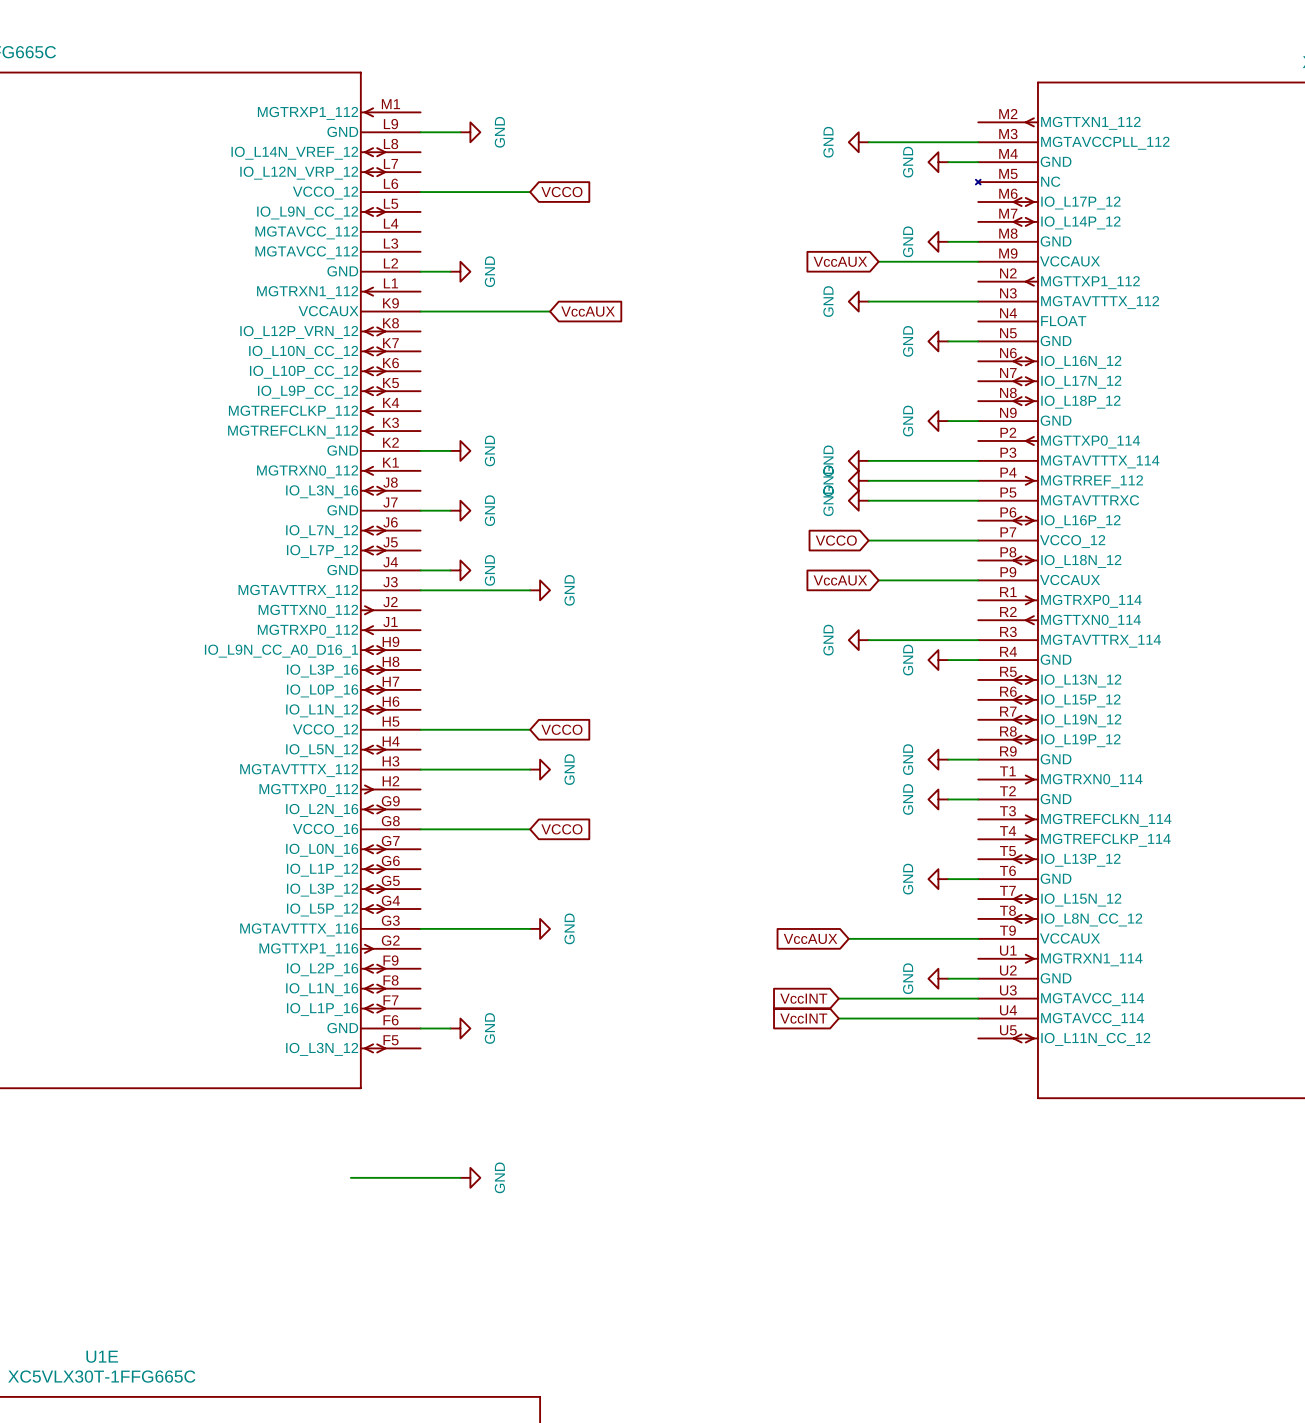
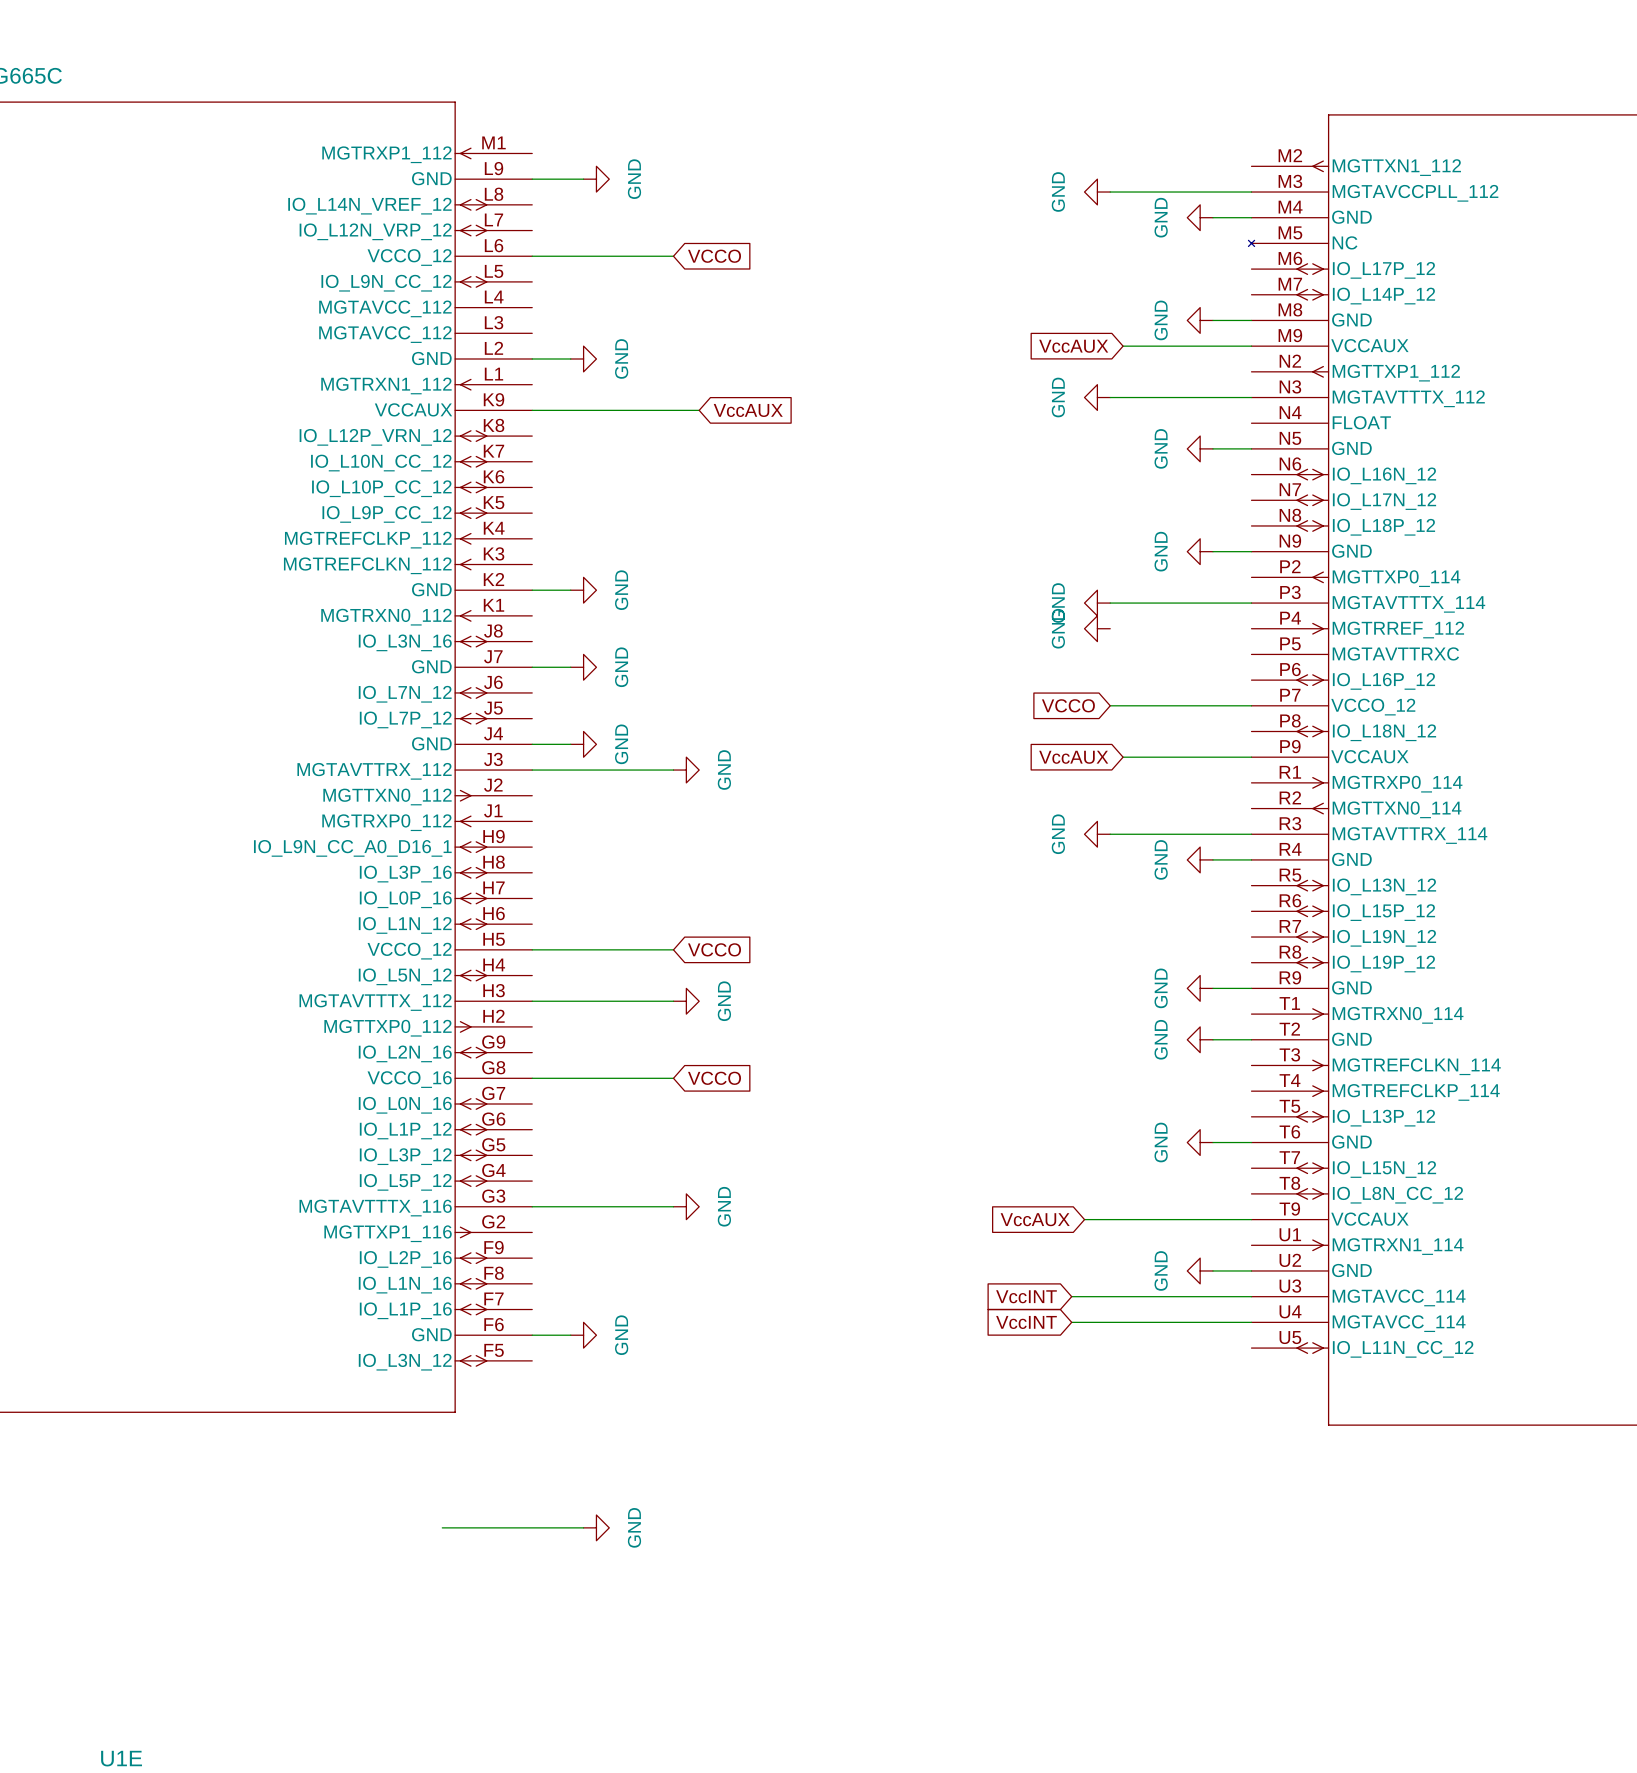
wire: (868, 480) (978, 480) -> none
power symbol: GND (858, 500) -> none
wire: (868, 500) (978, 500) -> none

